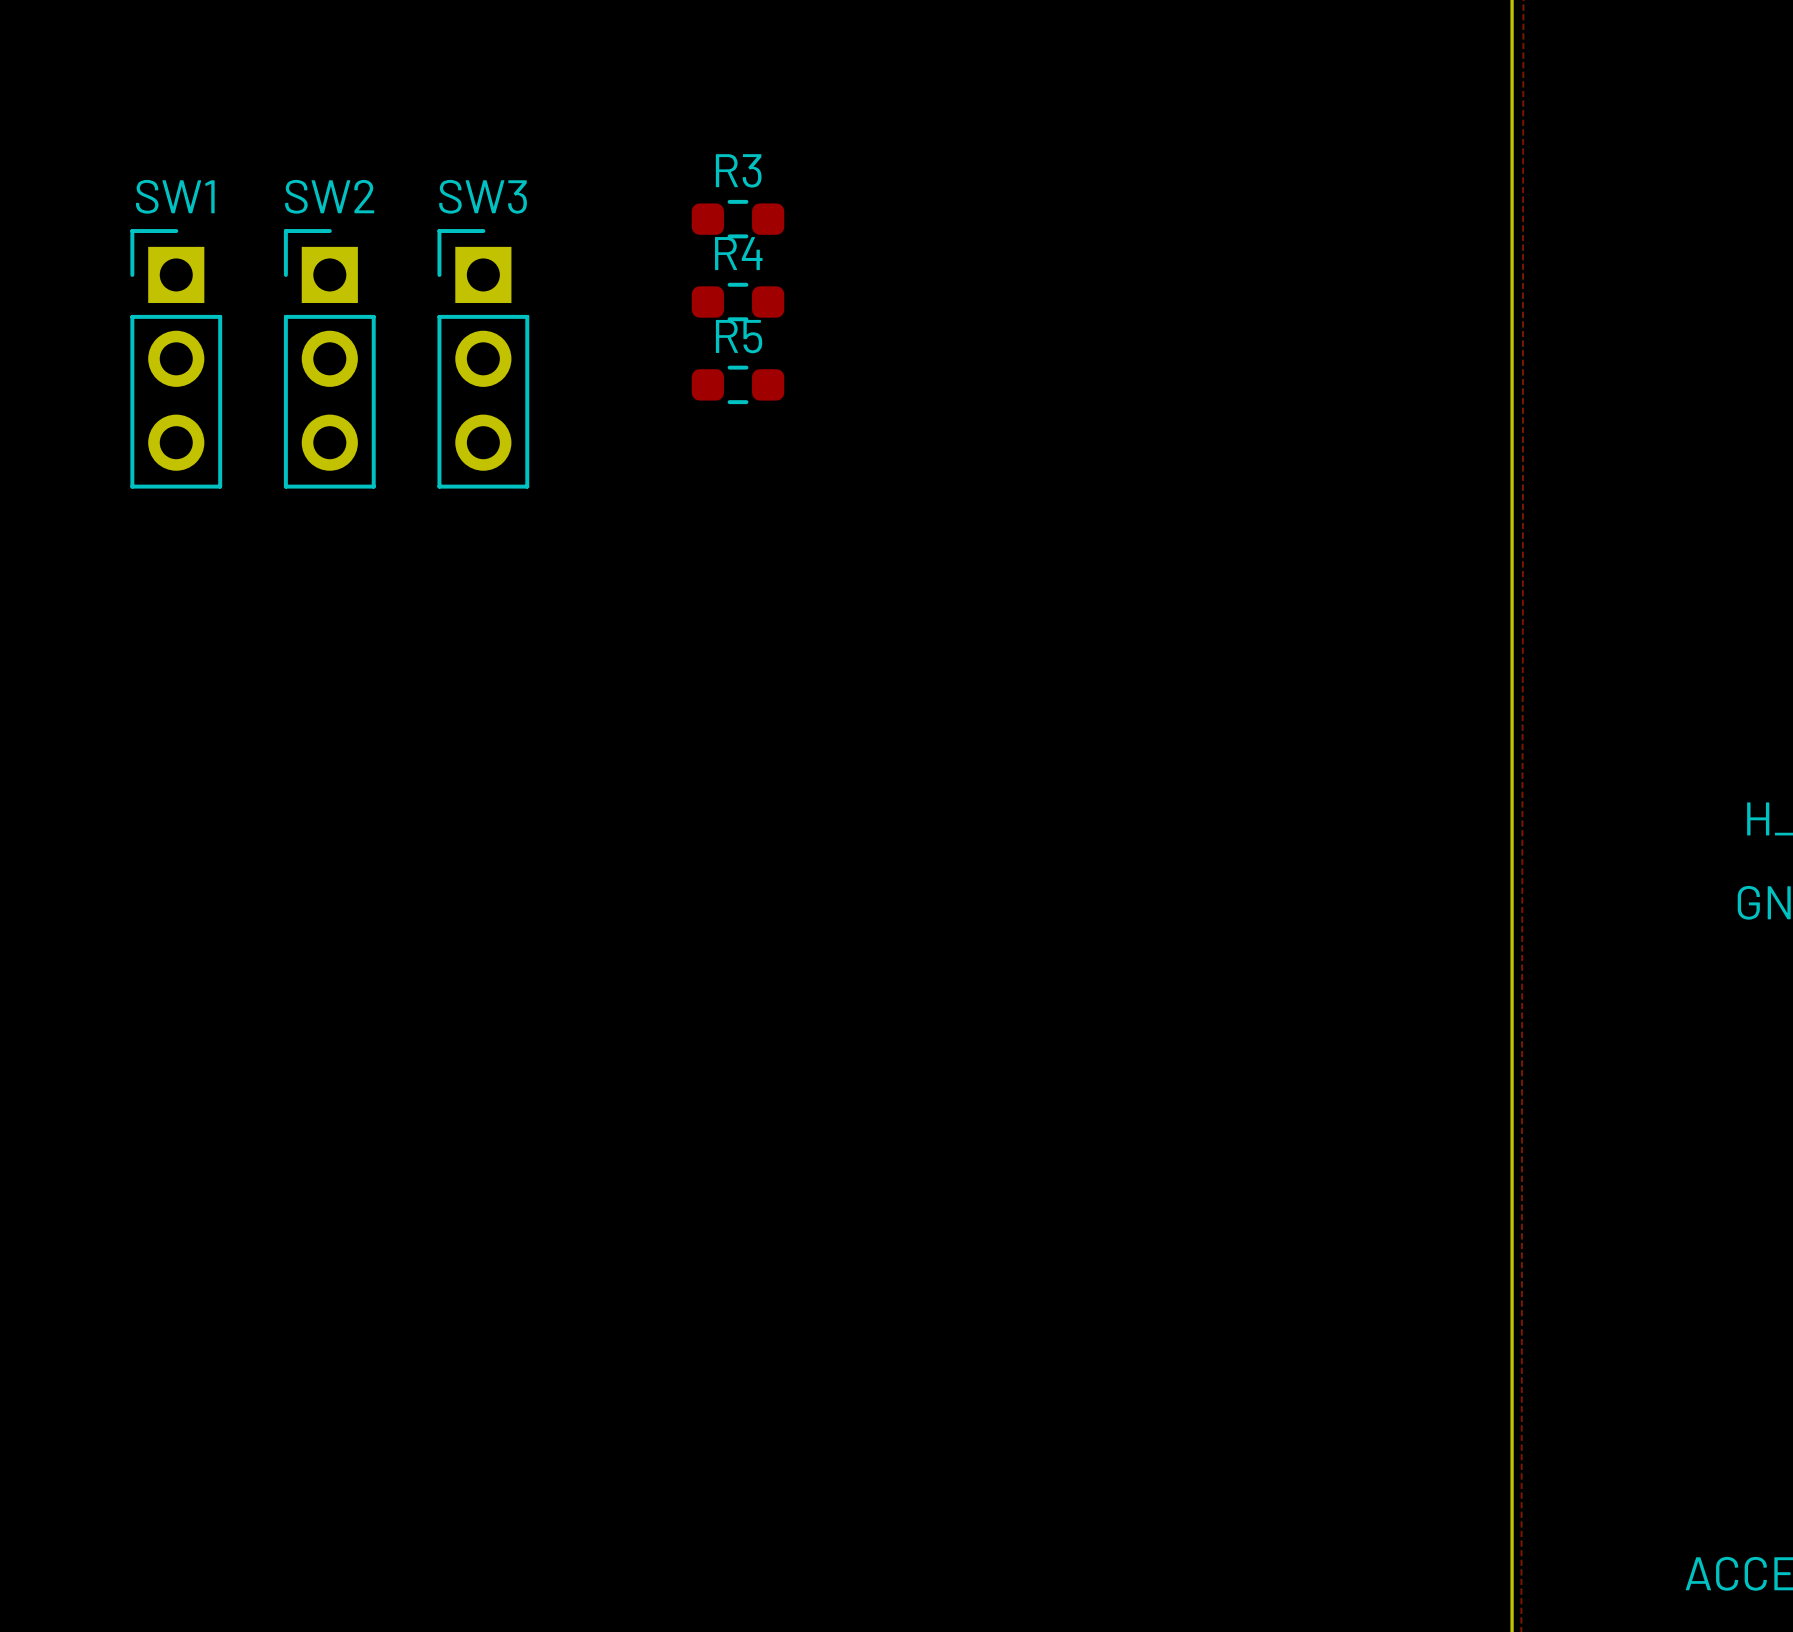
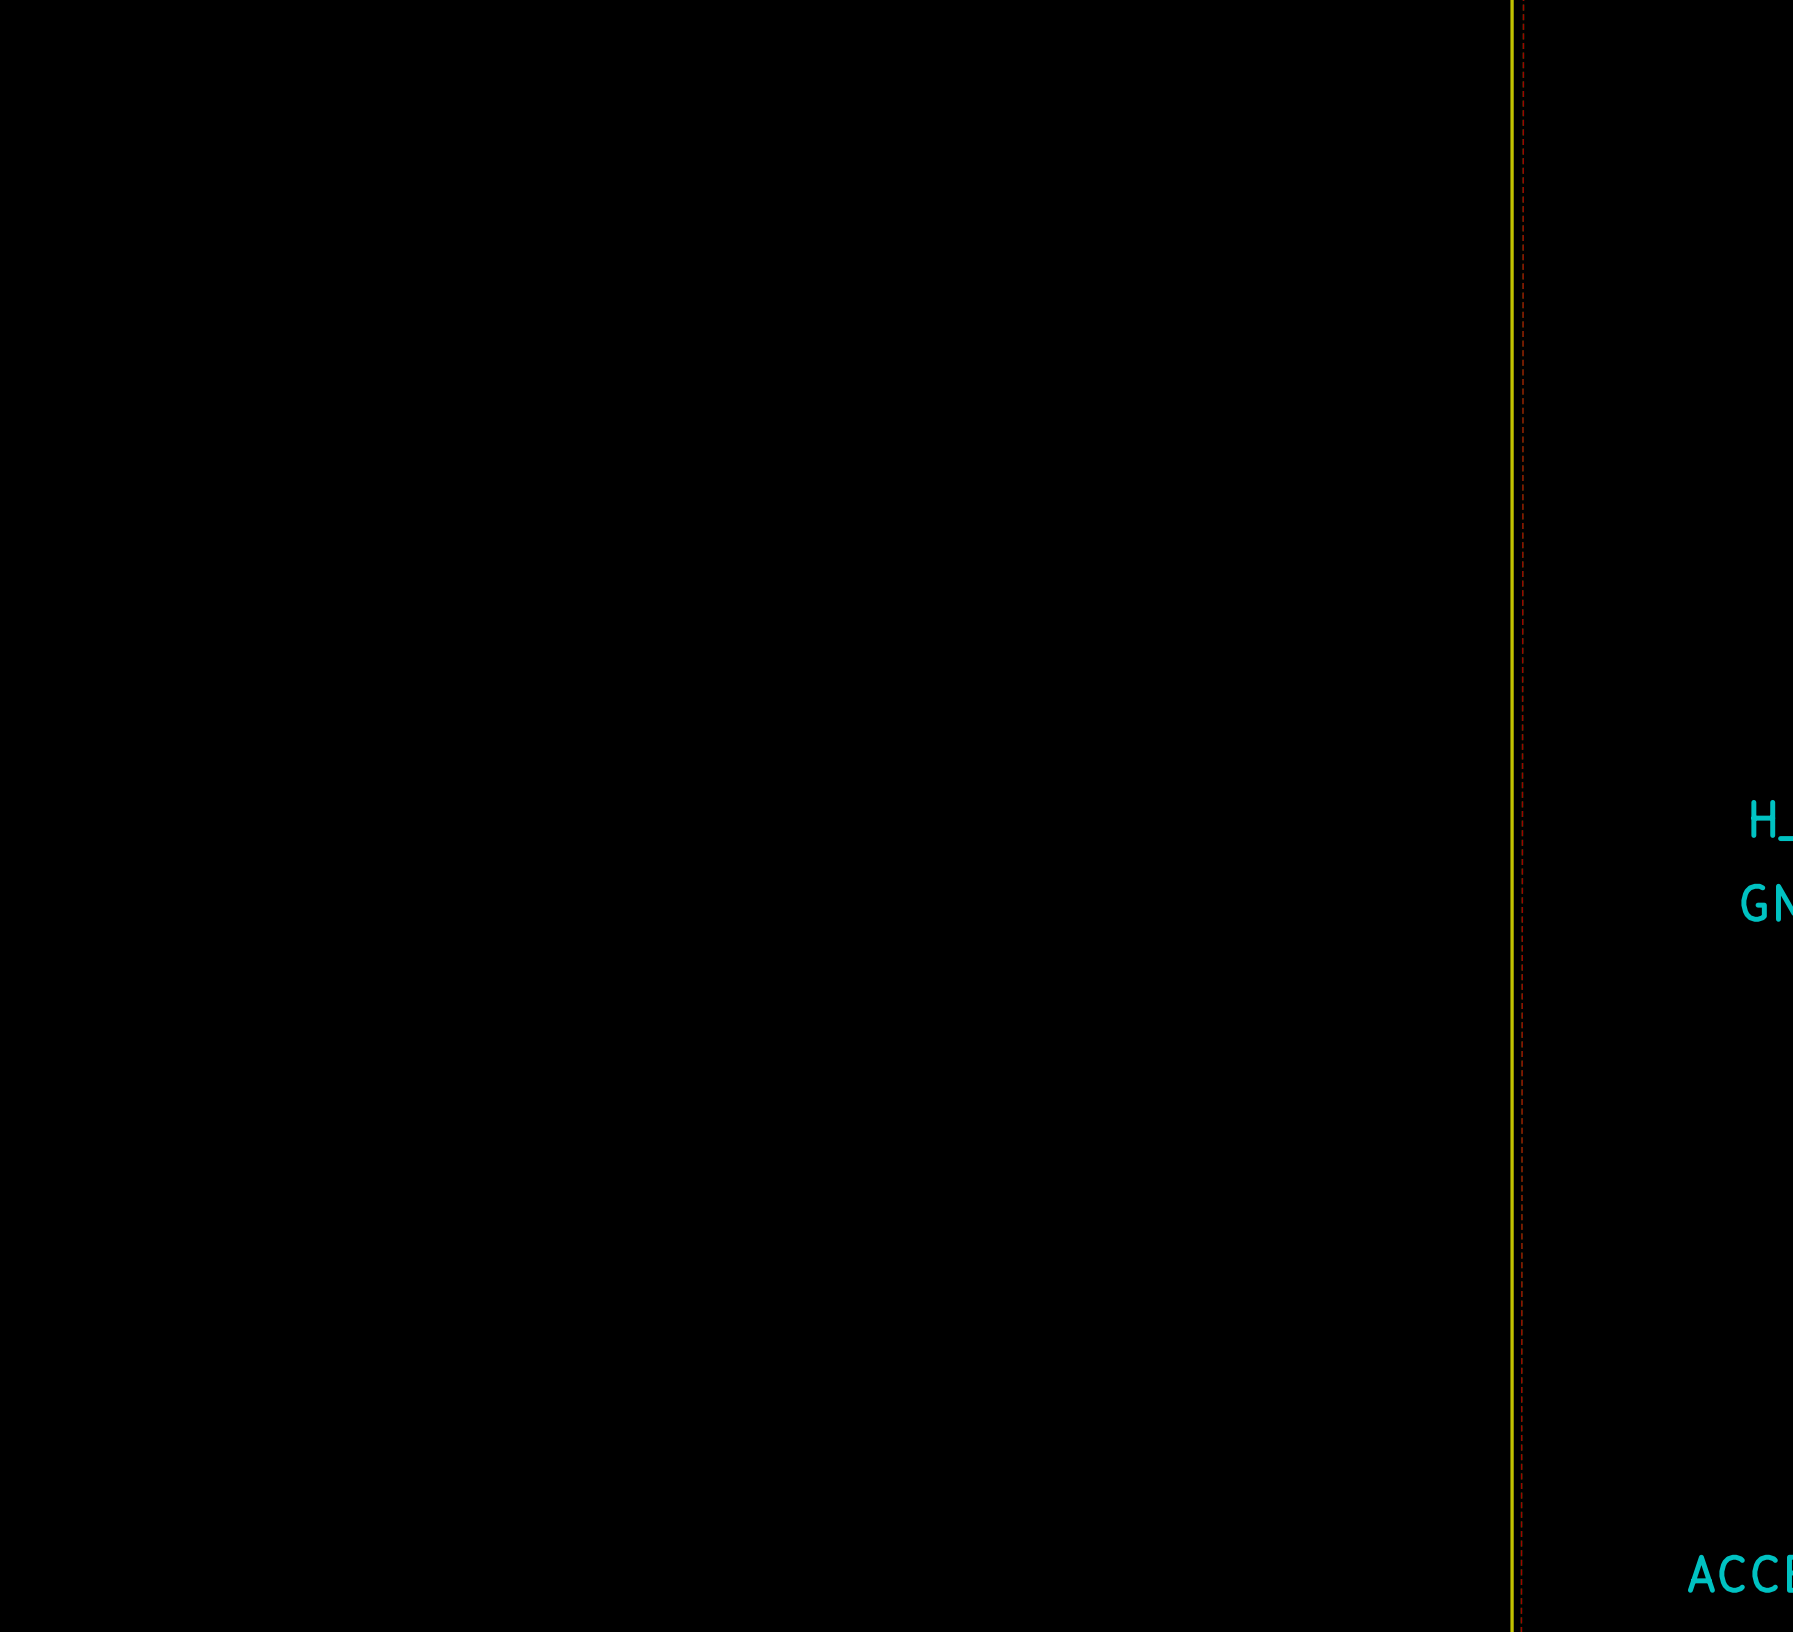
R3: (738, 219) -> none
R4: (738, 302) -> none
SW1: (176, 358) -> none
SW2: (329, 358) -> none
SW3: (483, 358) -> none
R5: (738, 384) -> none

